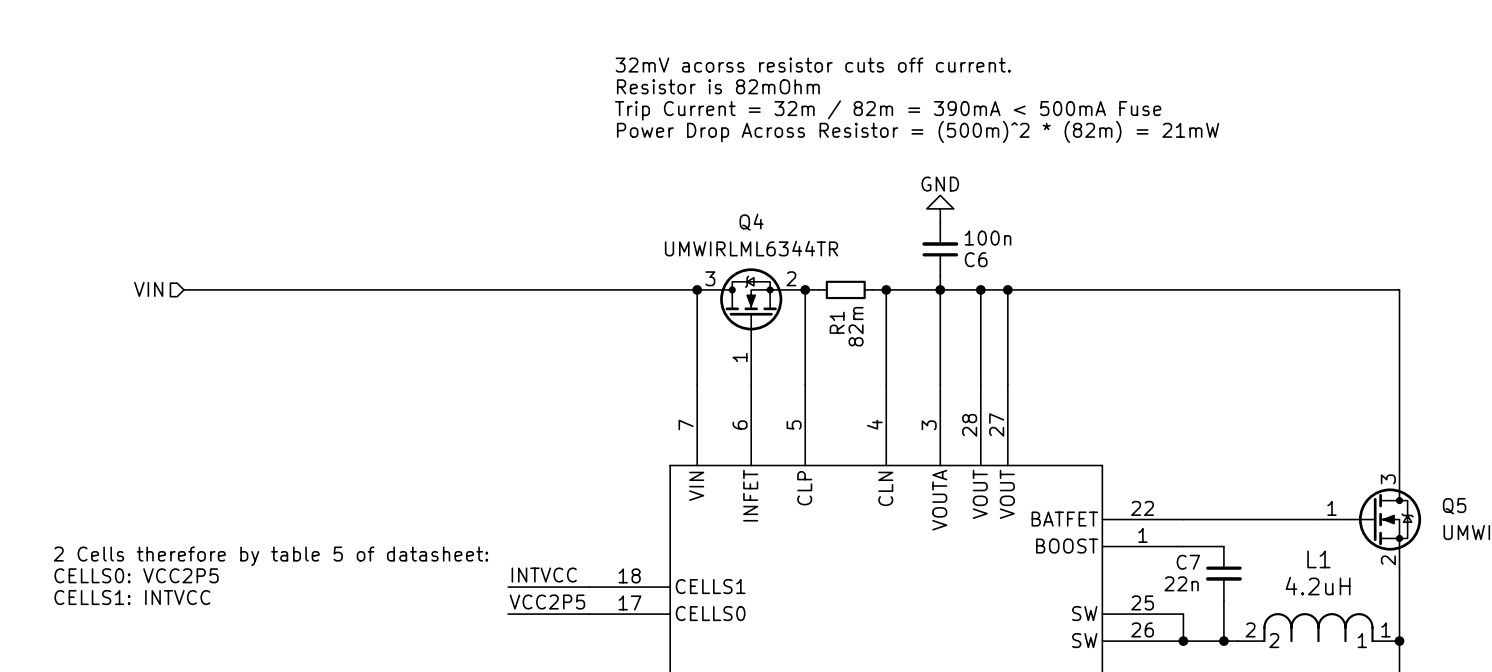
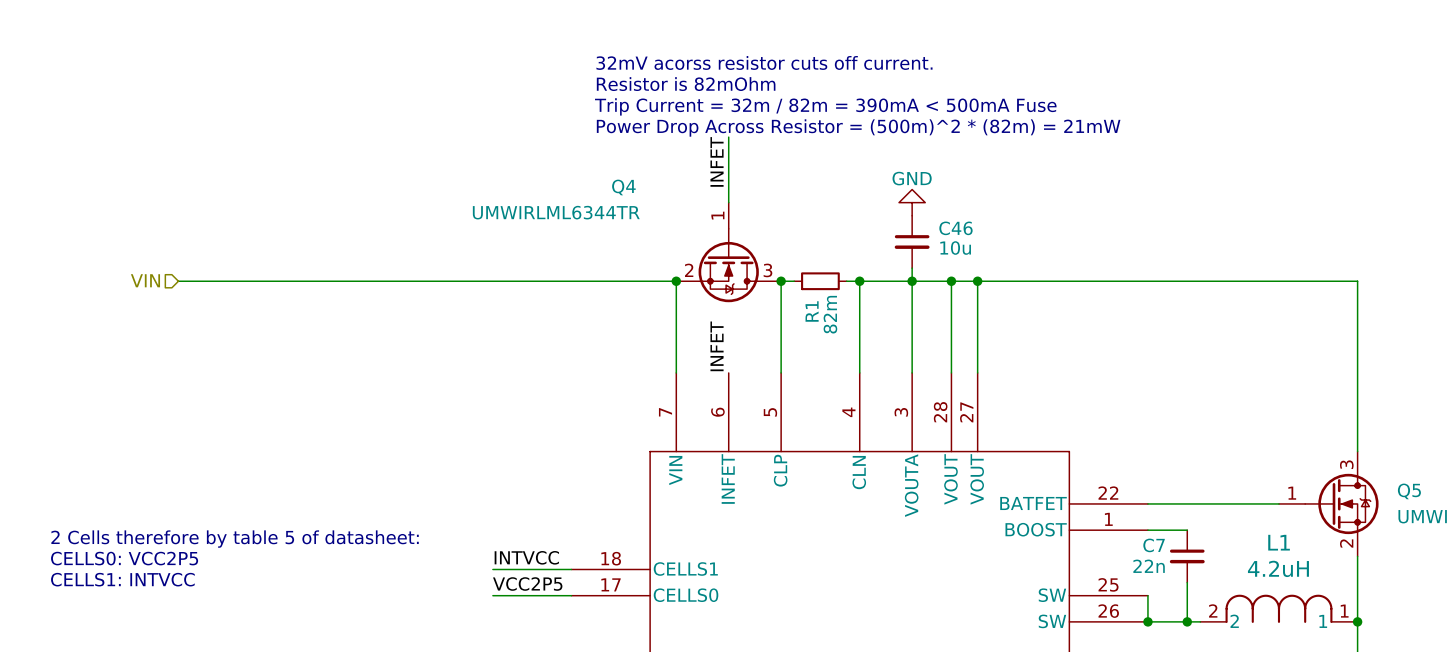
wire: none -> (728, 137) (728, 202)
label: none -> INFET (717, 161)
Q4 name position: Q4 (751, 222) -> Q4 (623, 187)
Q4 value position: UMWIRLML6344TR (751, 248) -> UMWIRLML6344TR (556, 212)
C6: 100n (940, 249) -> none
C46: none -> 10u (912, 241)
Q4 rotation: 0° (751, 306) -> 180° (728, 265)
label: none -> INFET (717, 346)
wire: (751, 370) (751, 384) -> none

